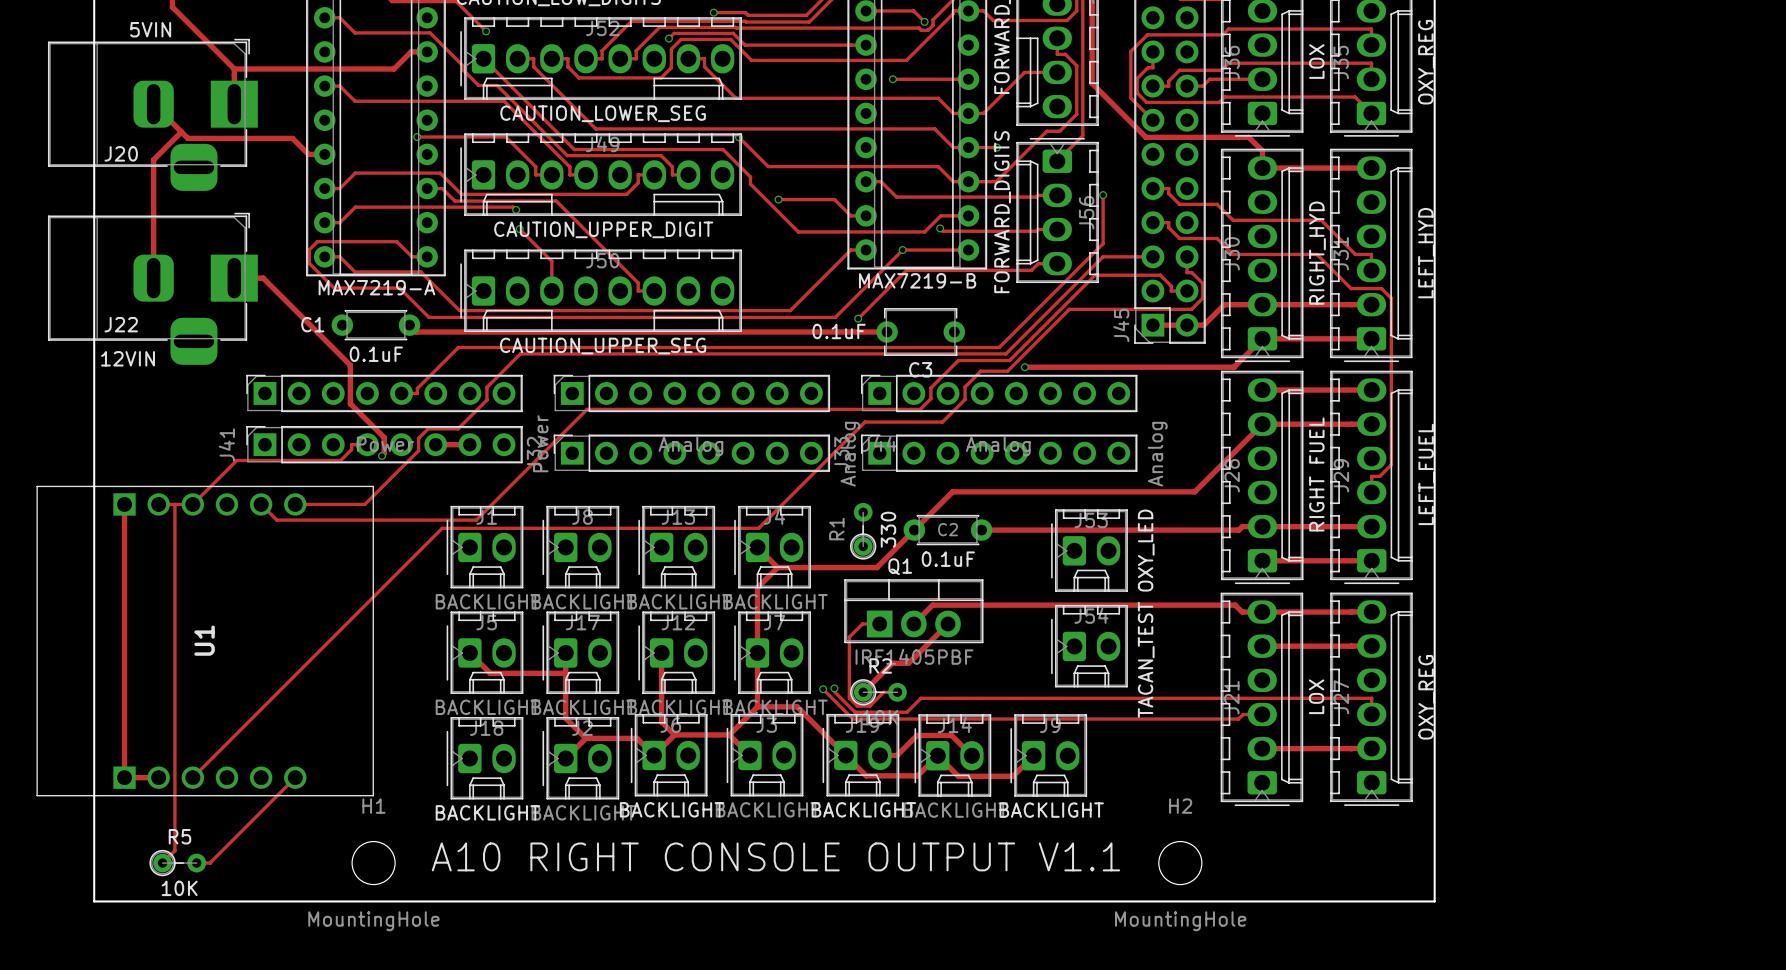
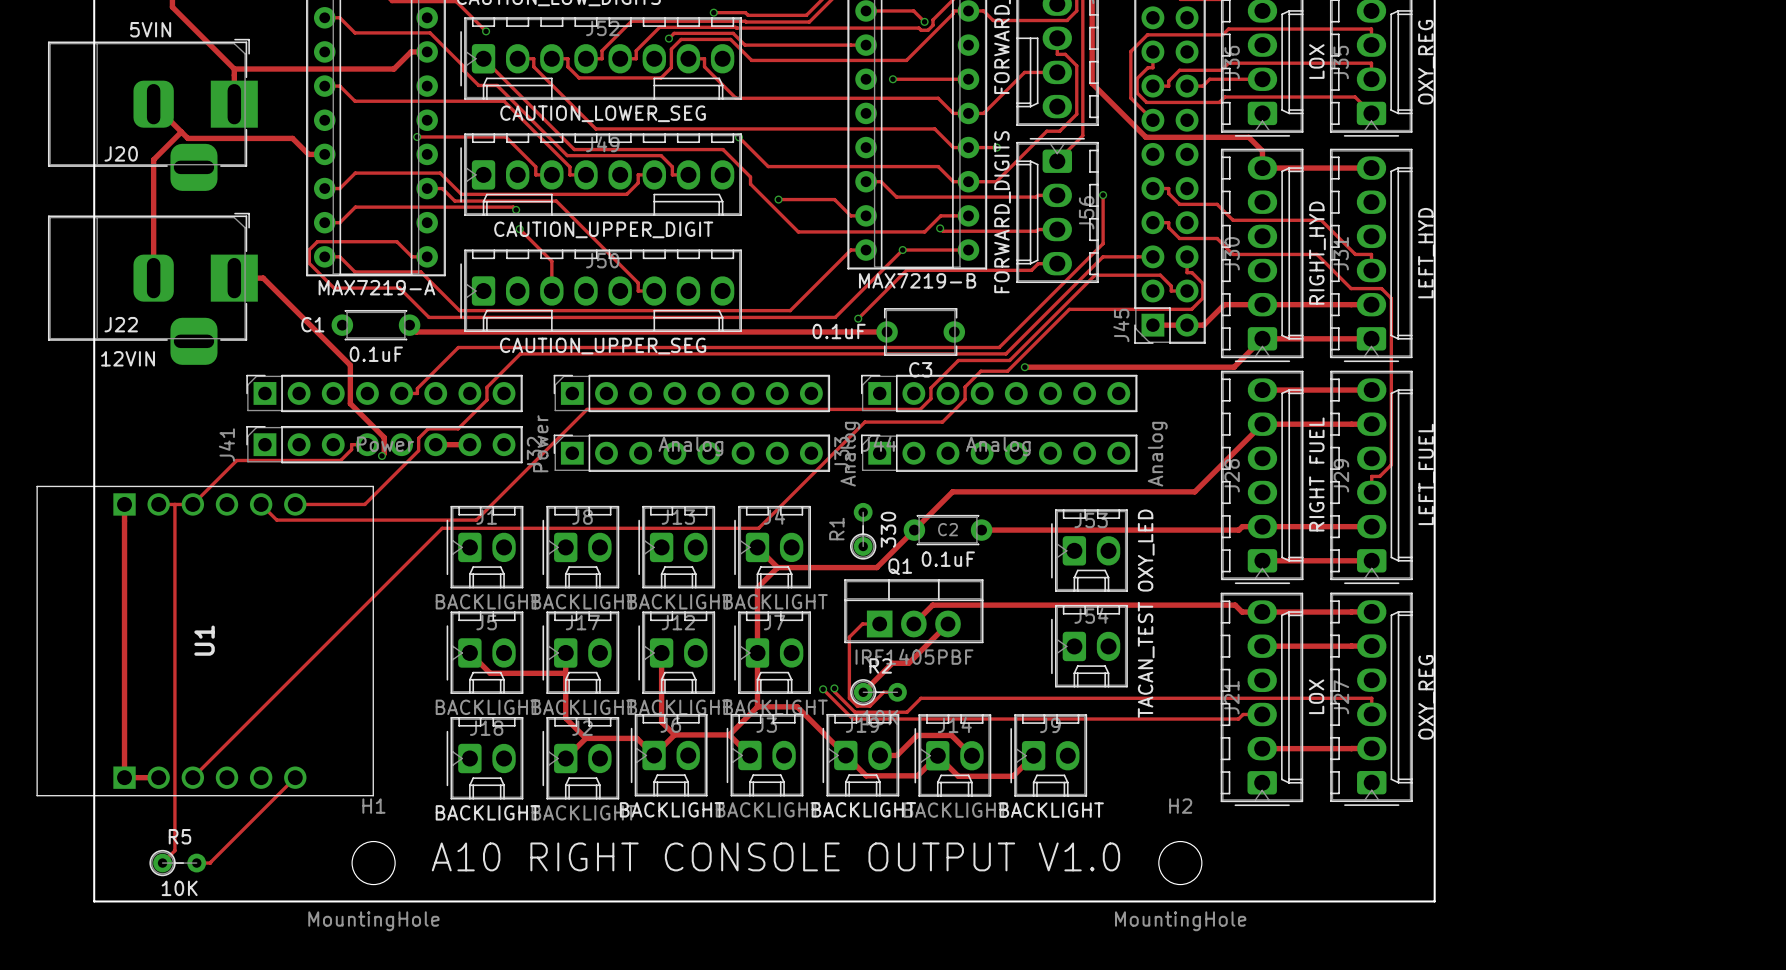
text: A10 RIGHT CONSOLE OUTPUT V1.1 (775, 856) -> A10 RIGHT CONSOLE OUTPUT V1.0 (775, 856)

